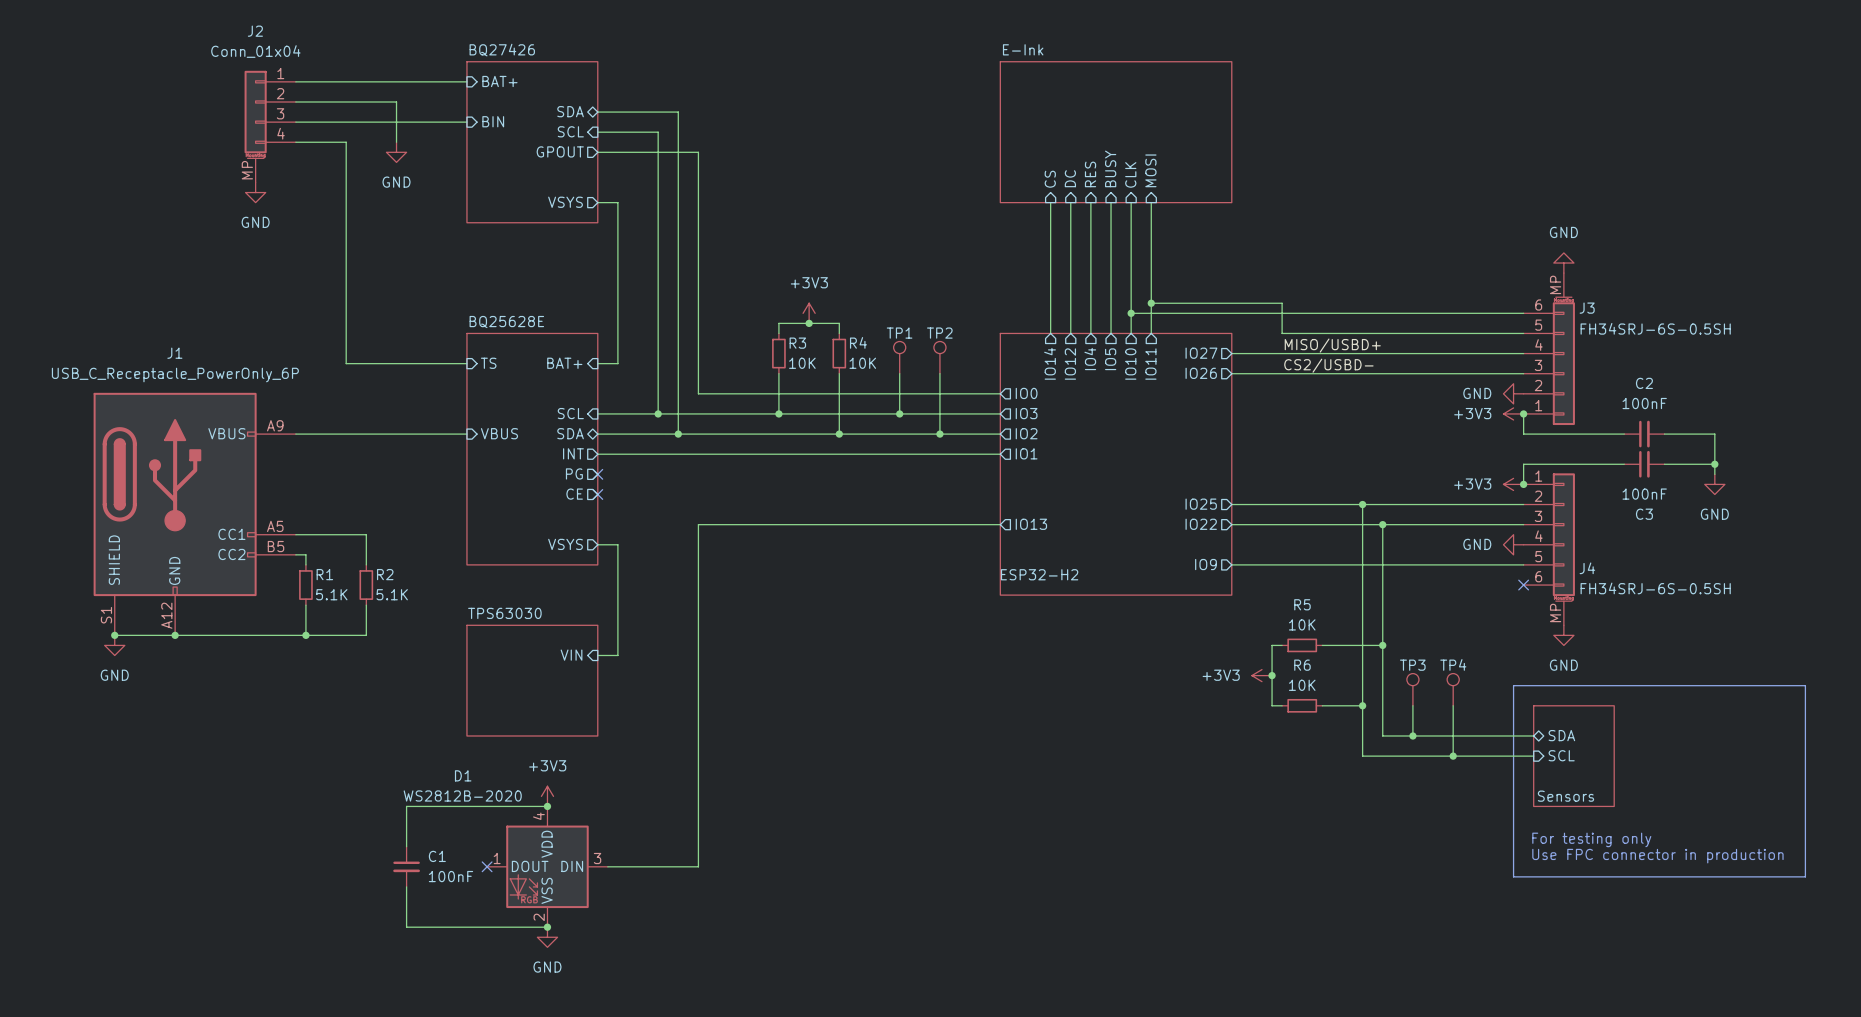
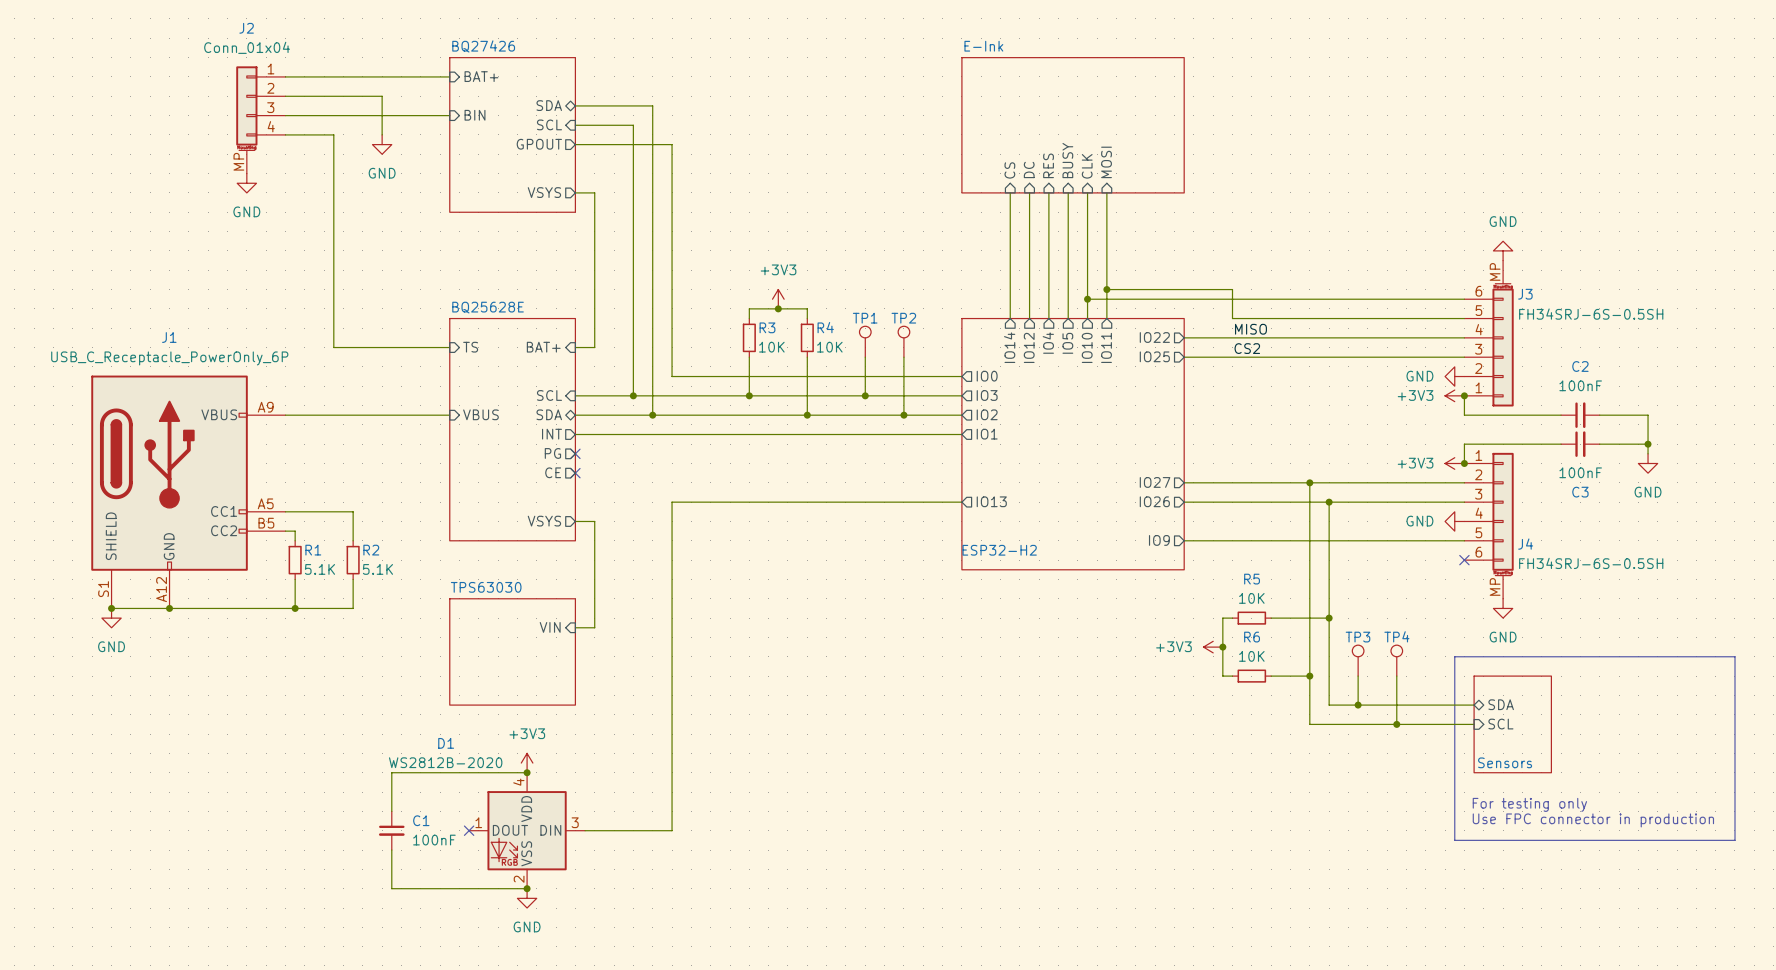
label: MISO/USBD+ (1332, 345) -> MISO (1250, 329)
sheet pin: IO27 (1201, 353) -> IO22 (1154, 337)
label: CS2/USBD- (1328, 365) -> CS2 (1247, 348)
sheet pin: IO26 (1201, 373) -> IO25 (1154, 356)
sheet pin: IO25 (1201, 504) -> IO27 (1155, 482)
sheet pin: IO22 (1201, 524) -> IO26 (1154, 501)

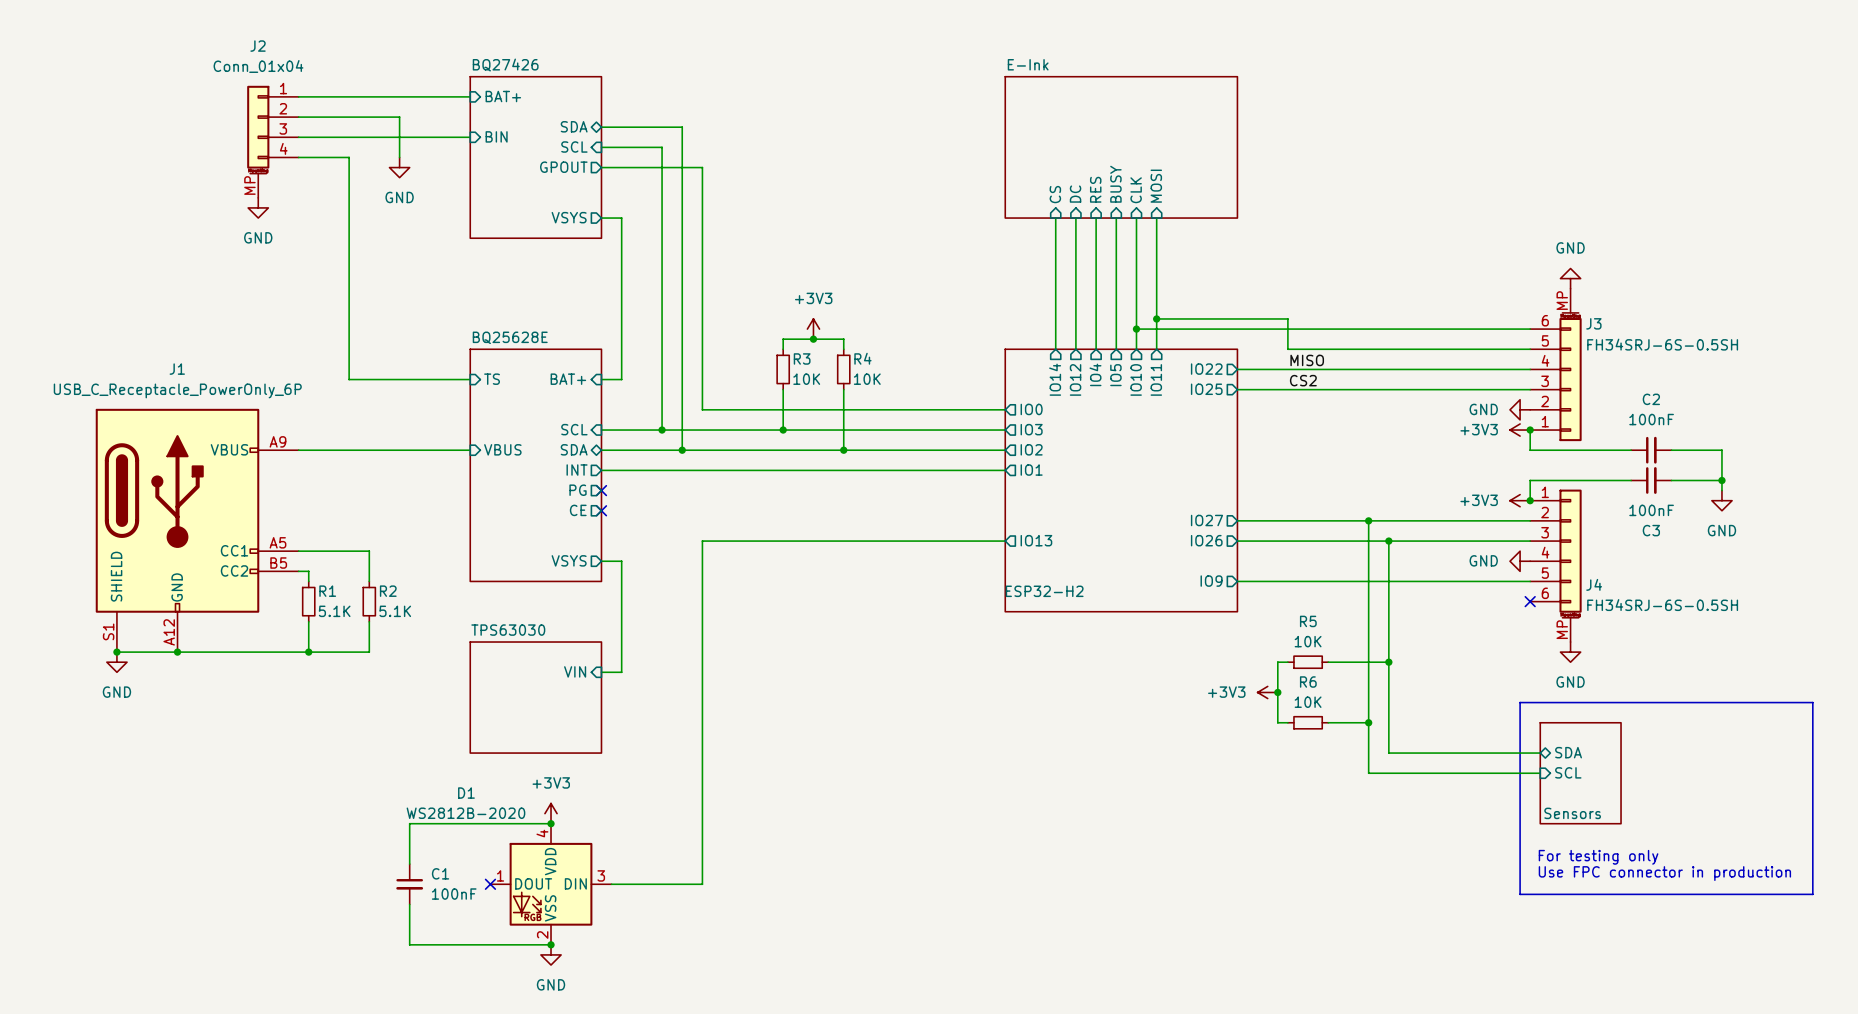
TP1: (865, 341) -> none
TP2: (903, 341) -> none
wire: (865, 357) (865, 395) -> none
wire: (903, 357) (903, 415) -> none
junction: (865, 395) -> none
junction: (903, 415) -> none
TP3: (1358, 660) -> none
TP4: (1396, 660) -> none
wire: (1358, 676) (1358, 705) -> none
wire: (1396, 676) (1396, 724) -> none
junction: (1358, 705) -> none
junction: (1396, 724) -> none

